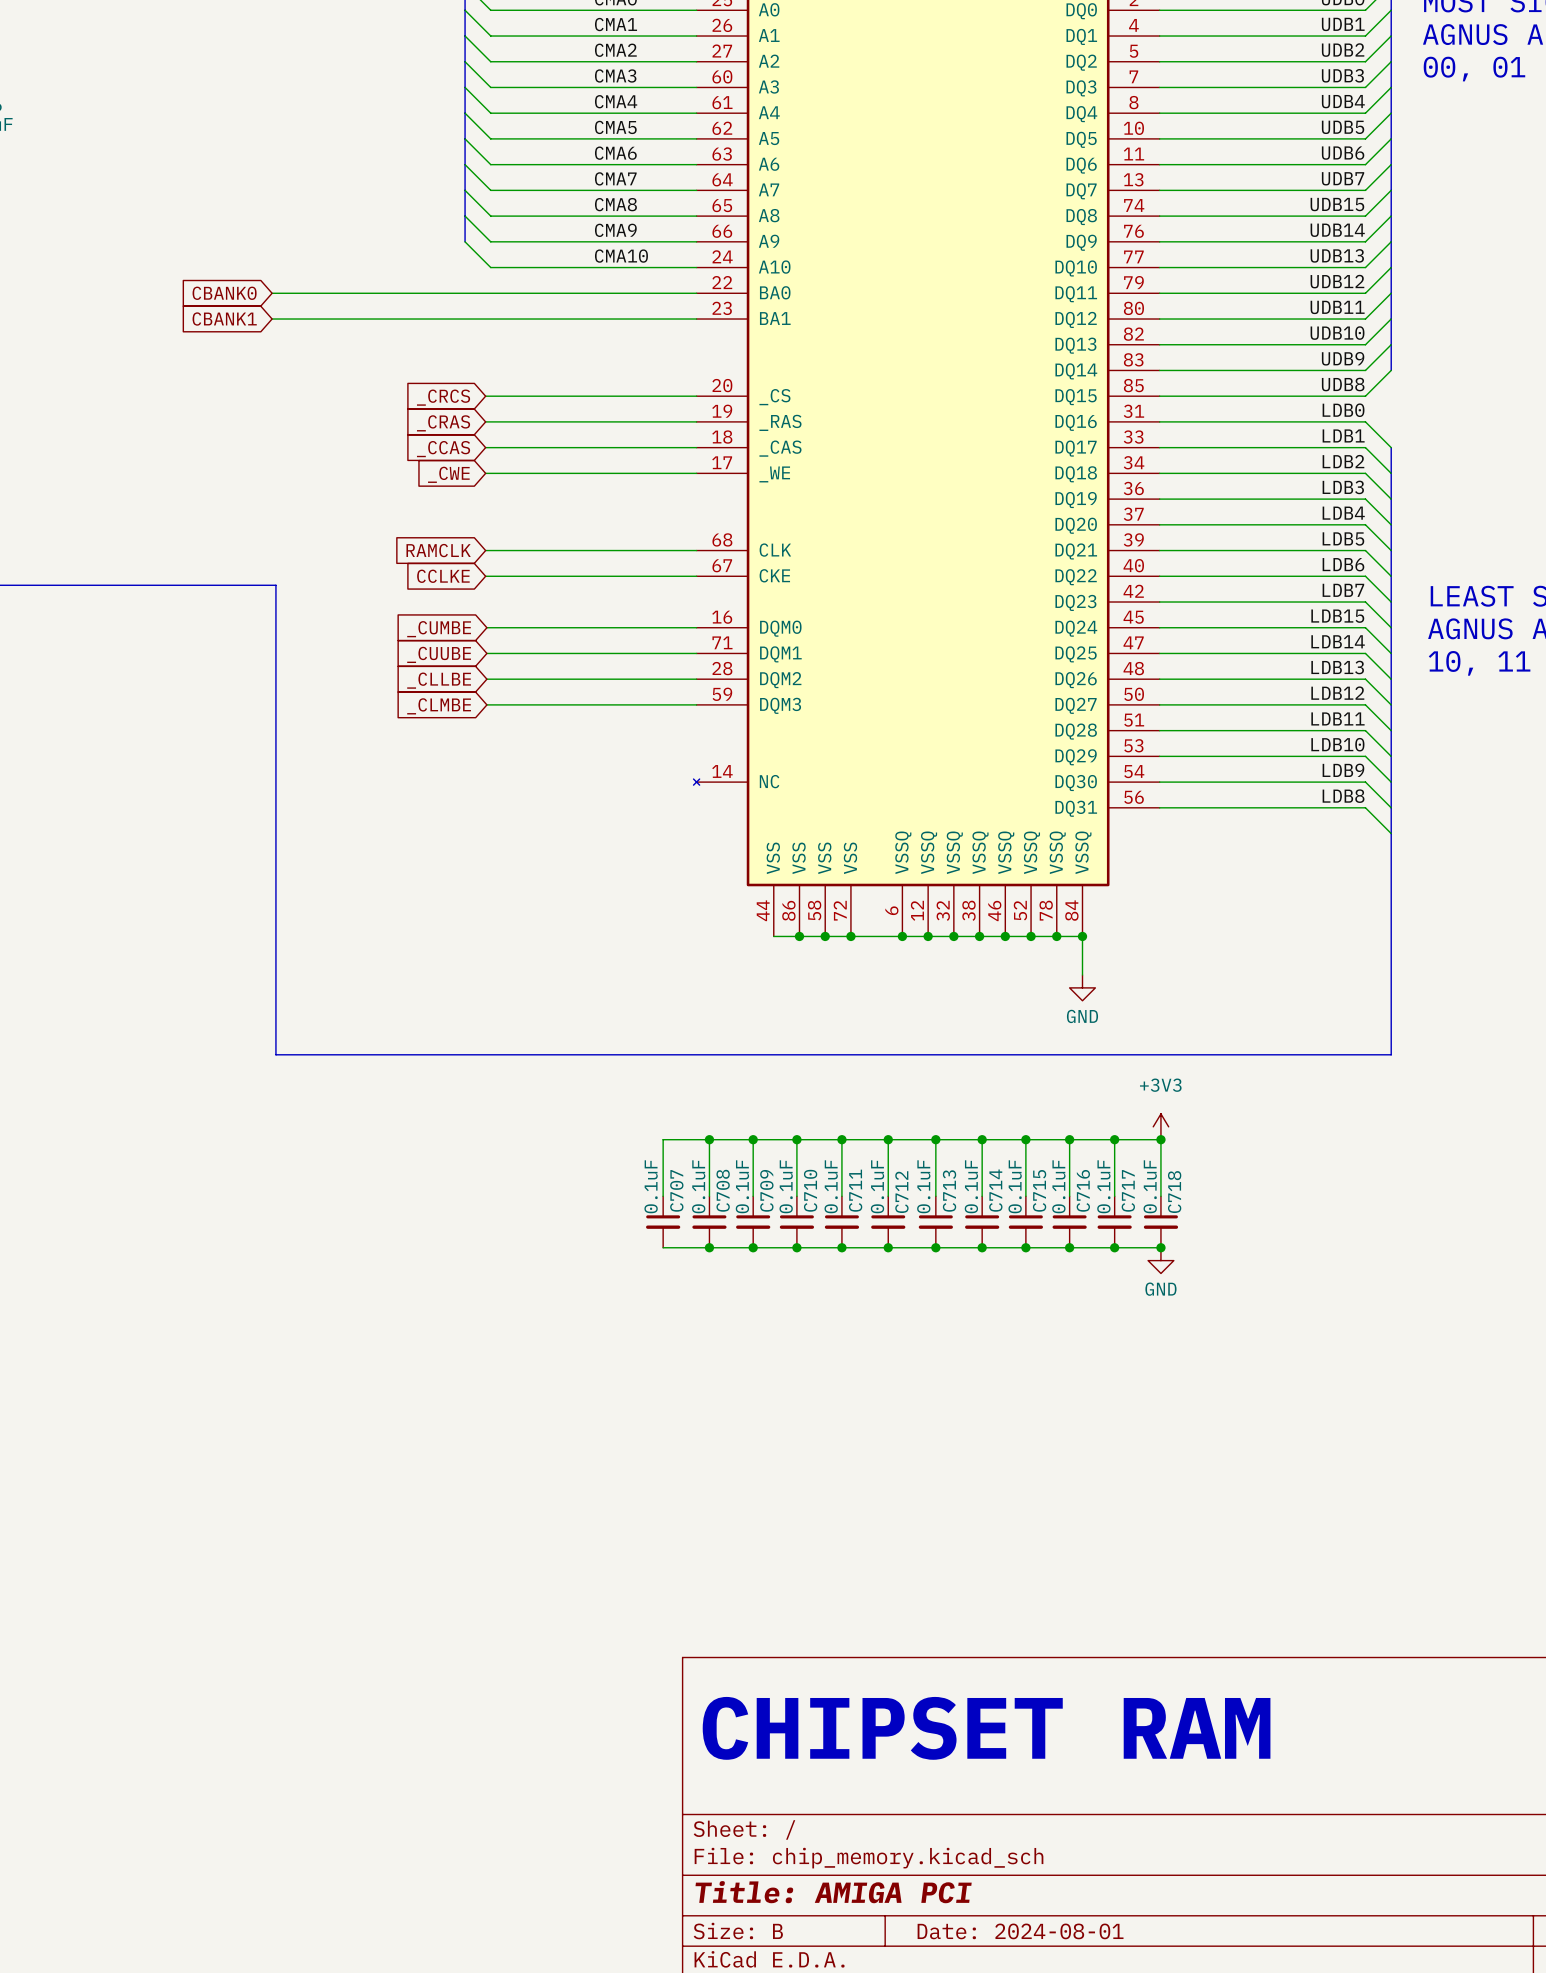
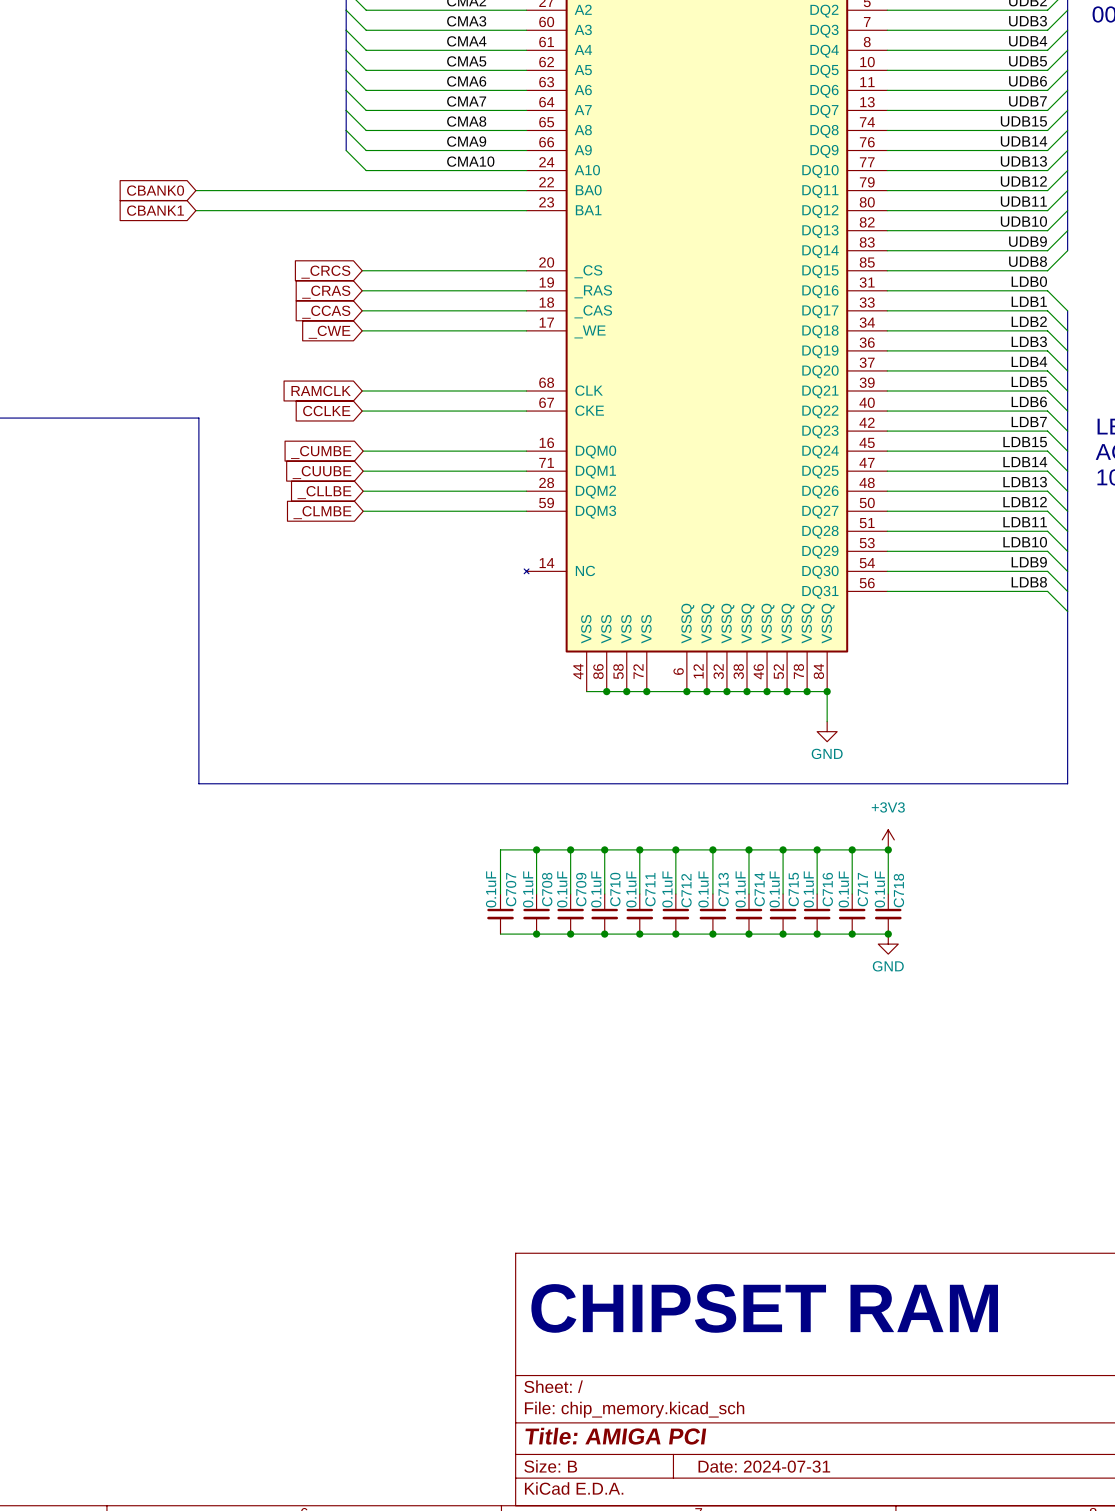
title block: Date: 2024-08-01 (1020, 1931) -> Date: 2024-07-31 (764, 1466)

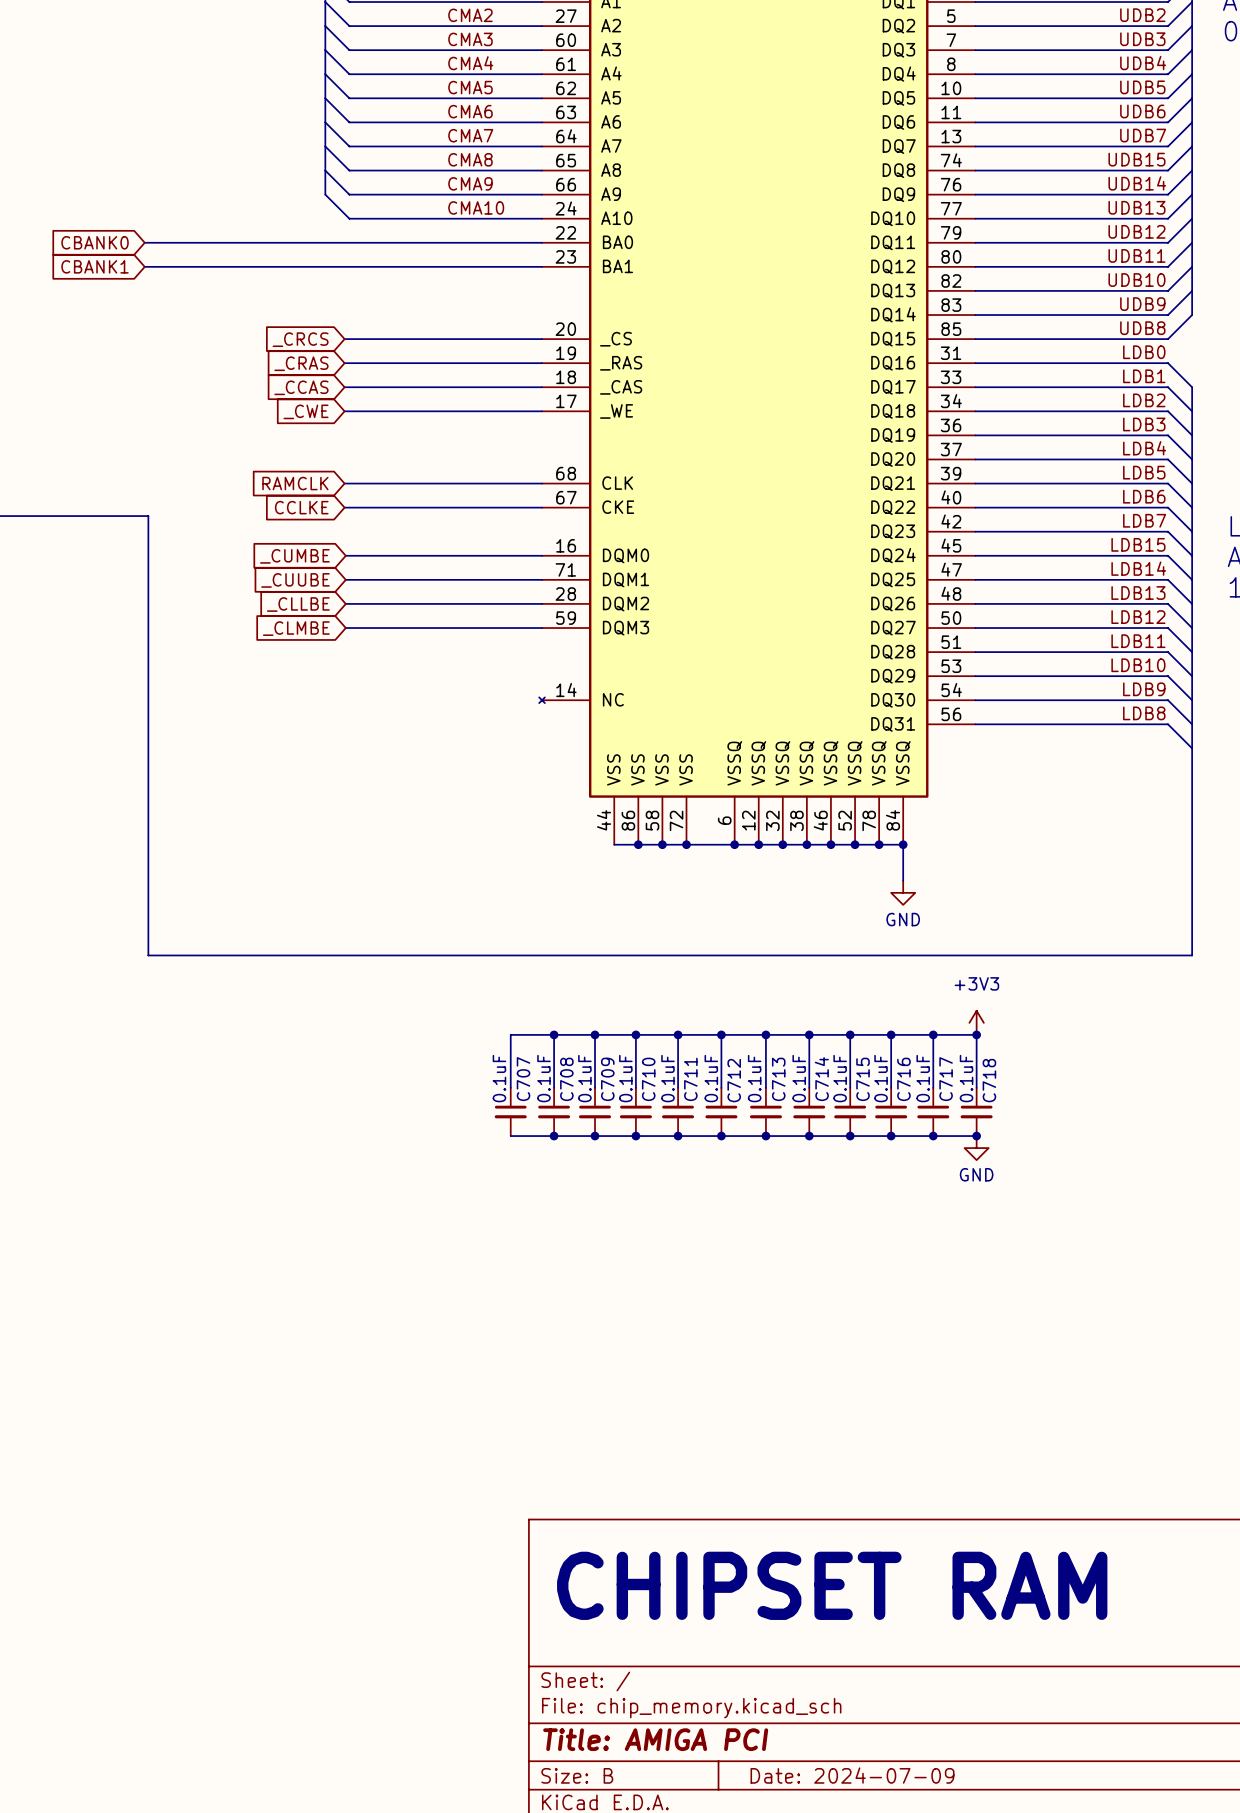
title block: Date: 2024-07-31 (764, 1466) -> Date: 2024-07-09 (852, 1775)

